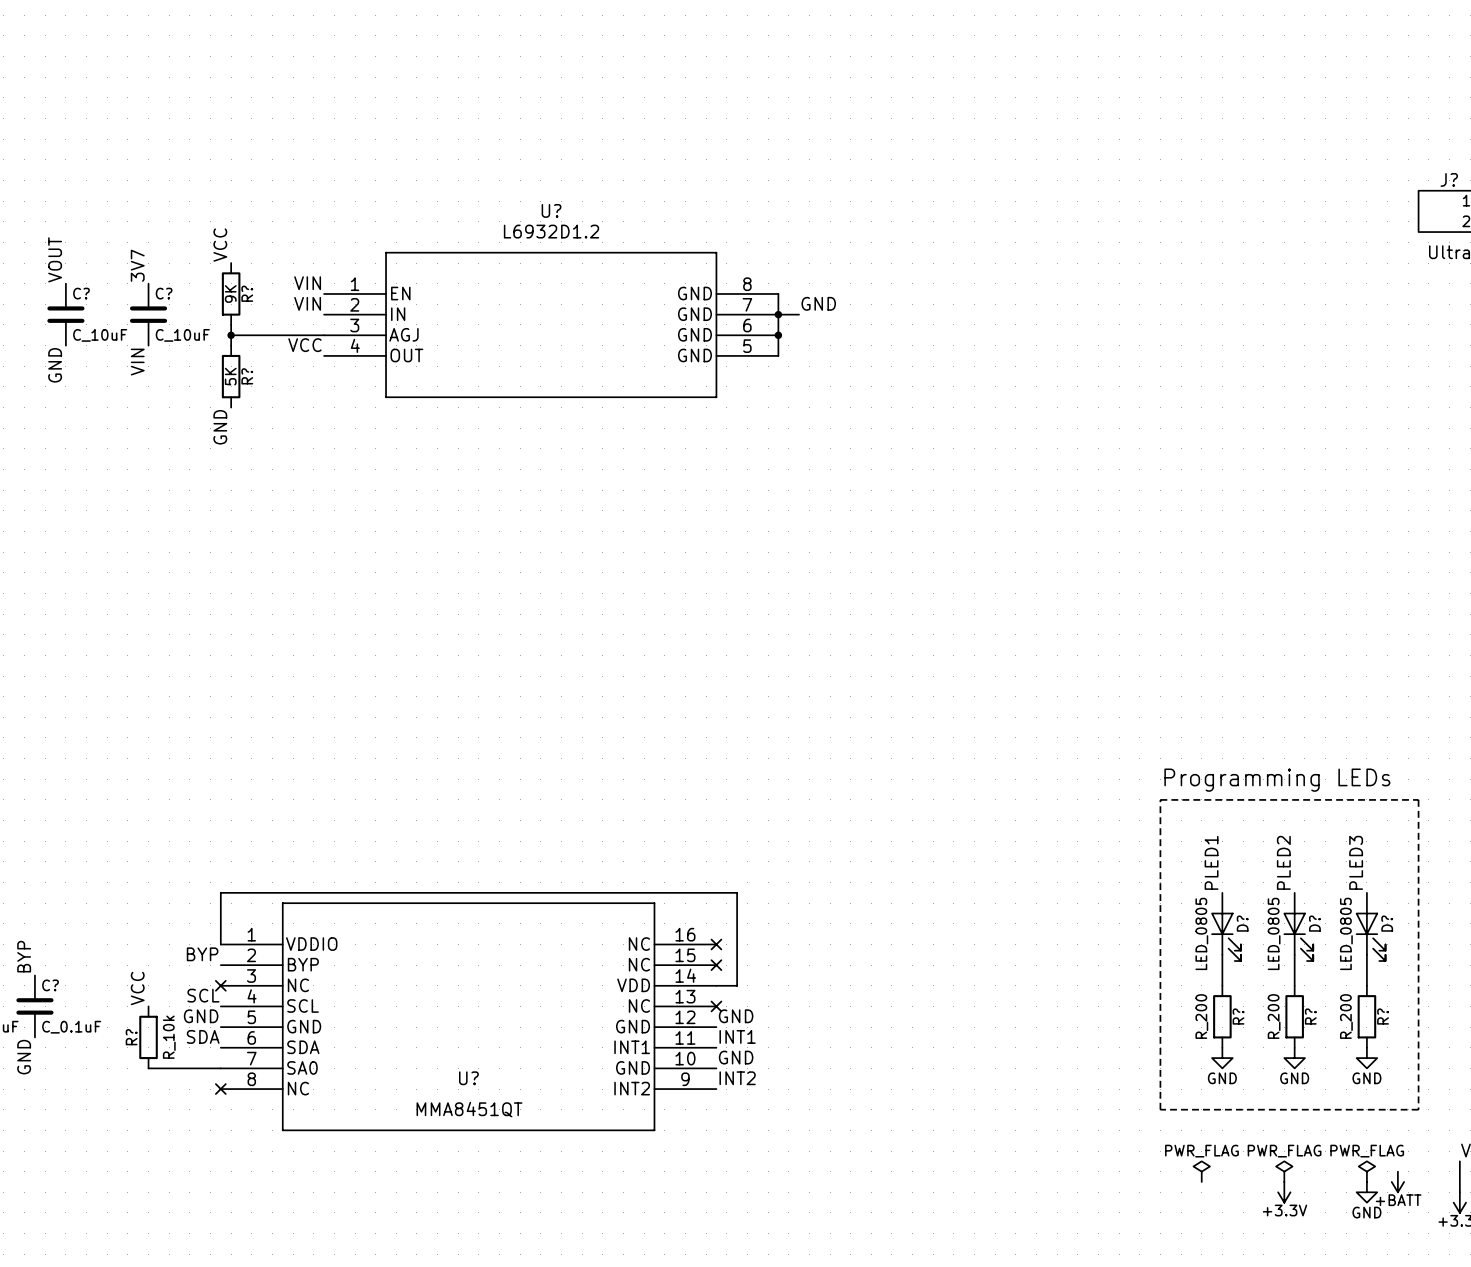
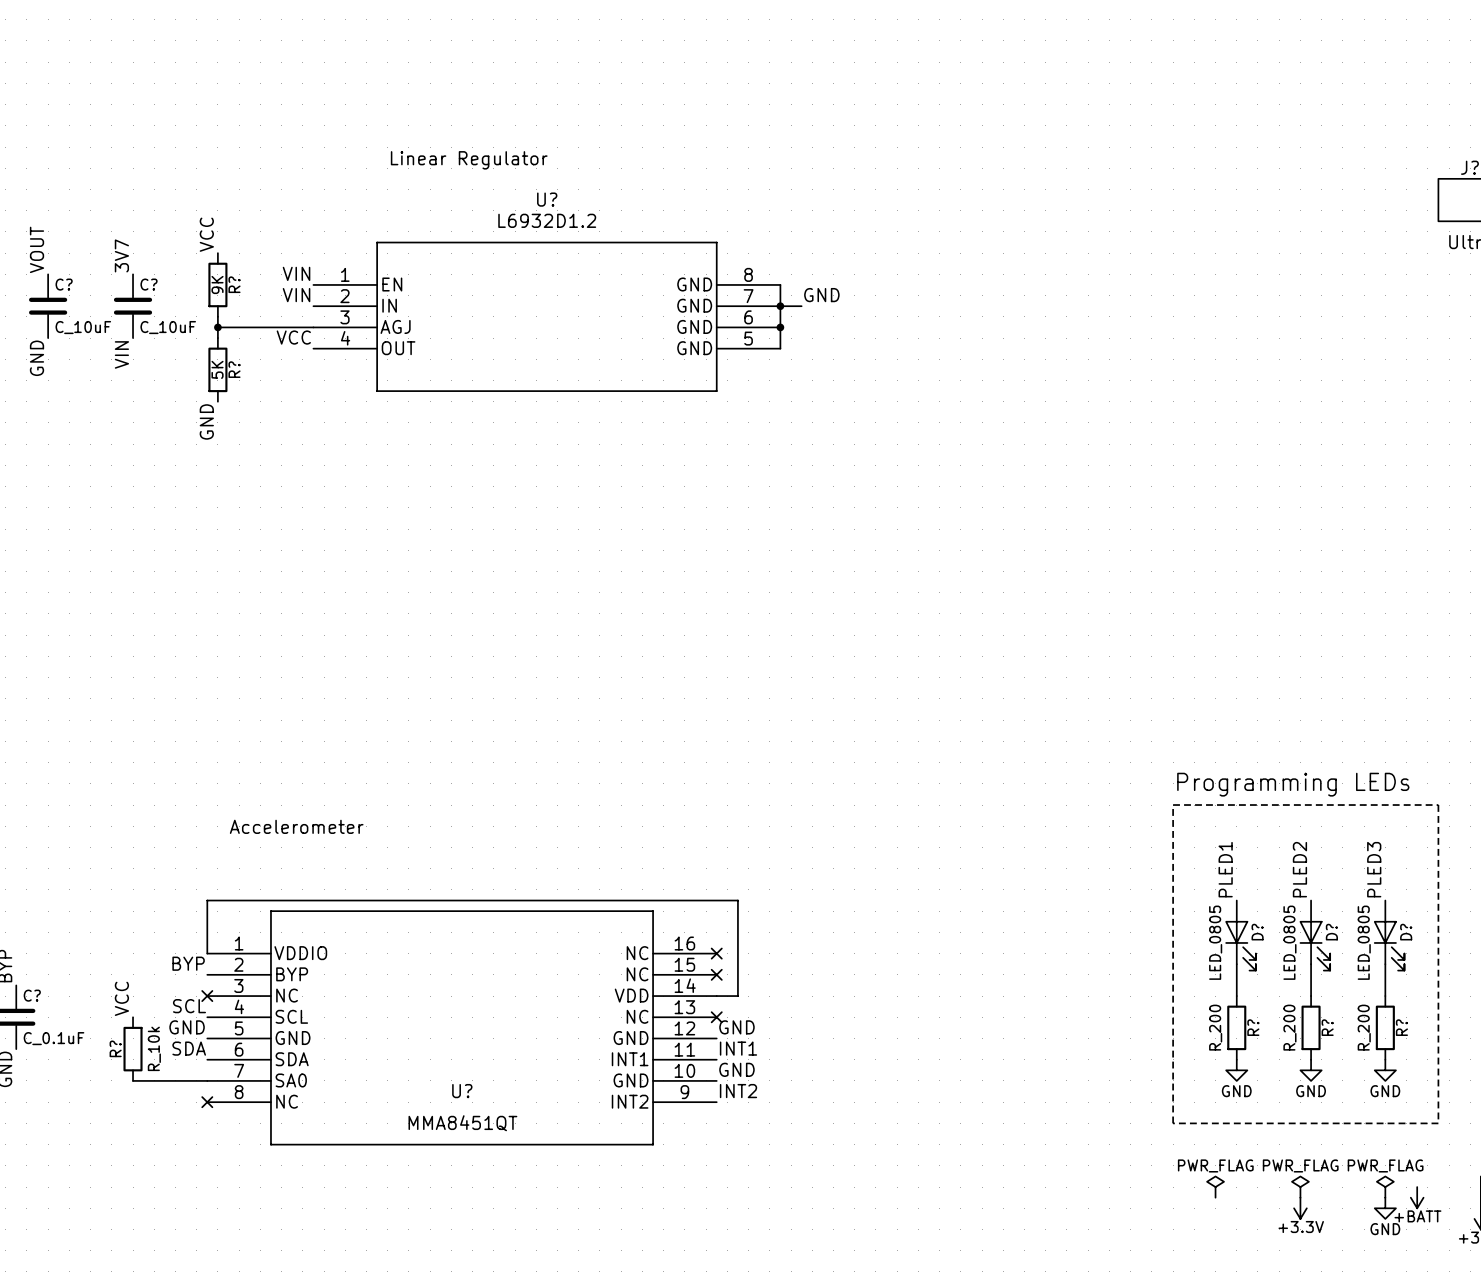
text: none -> Linear Regulator (469, 160)
text: none -> Accelerometer (296, 826)

